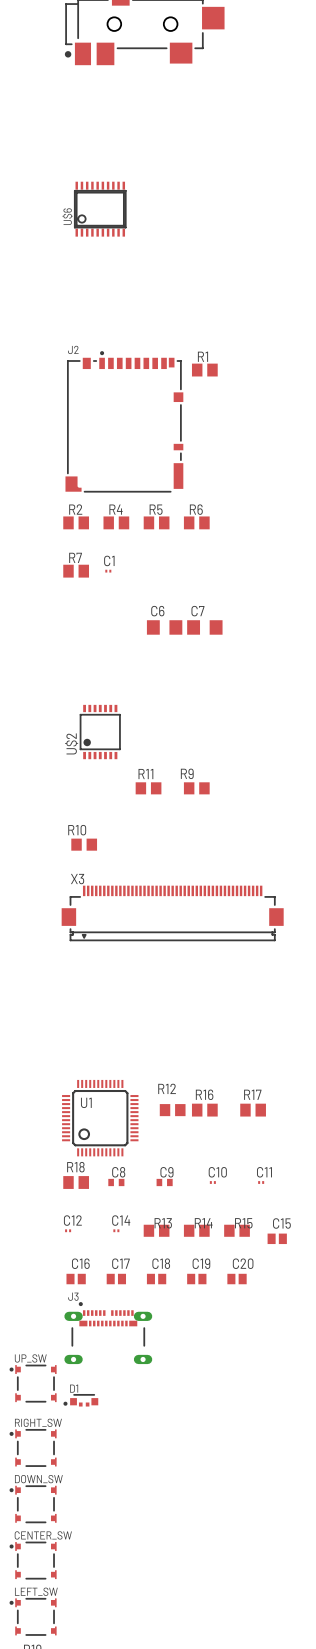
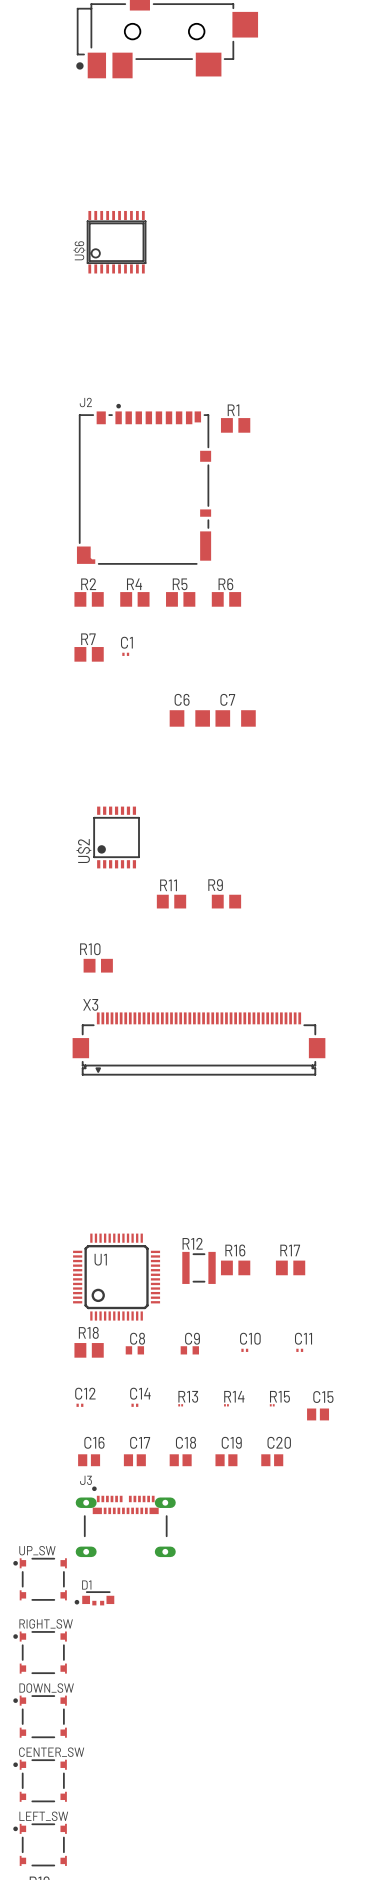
R12 footprint: [159, 1104, 186, 1117] -> [182, 1251, 216, 1284]
R13 footprint: [143, 1224, 170, 1237] -> [178, 1404, 184, 1407]
R14 footprint: [183, 1224, 210, 1237] -> [224, 1404, 229, 1407]
R15 footprint: [224, 1224, 250, 1237] -> [269, 1404, 275, 1407]

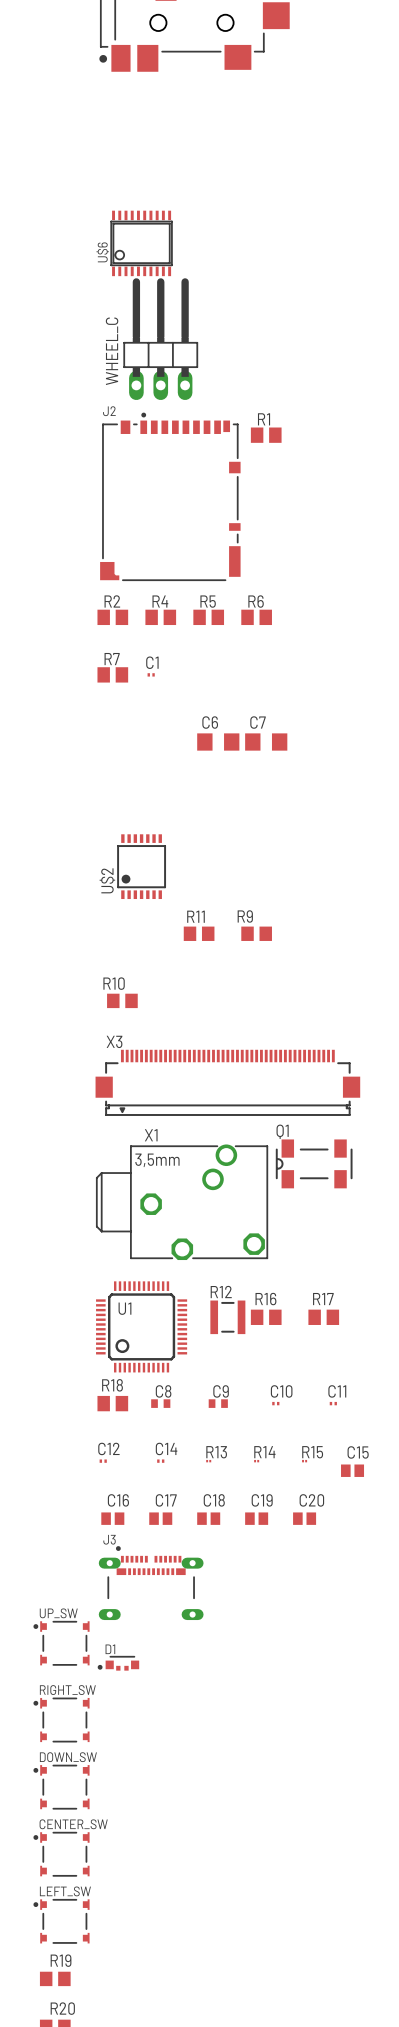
WHEEL_C: none -> (160, 339)
Q1: none -> (314, 1163)
X1: none -> (182, 1202)

